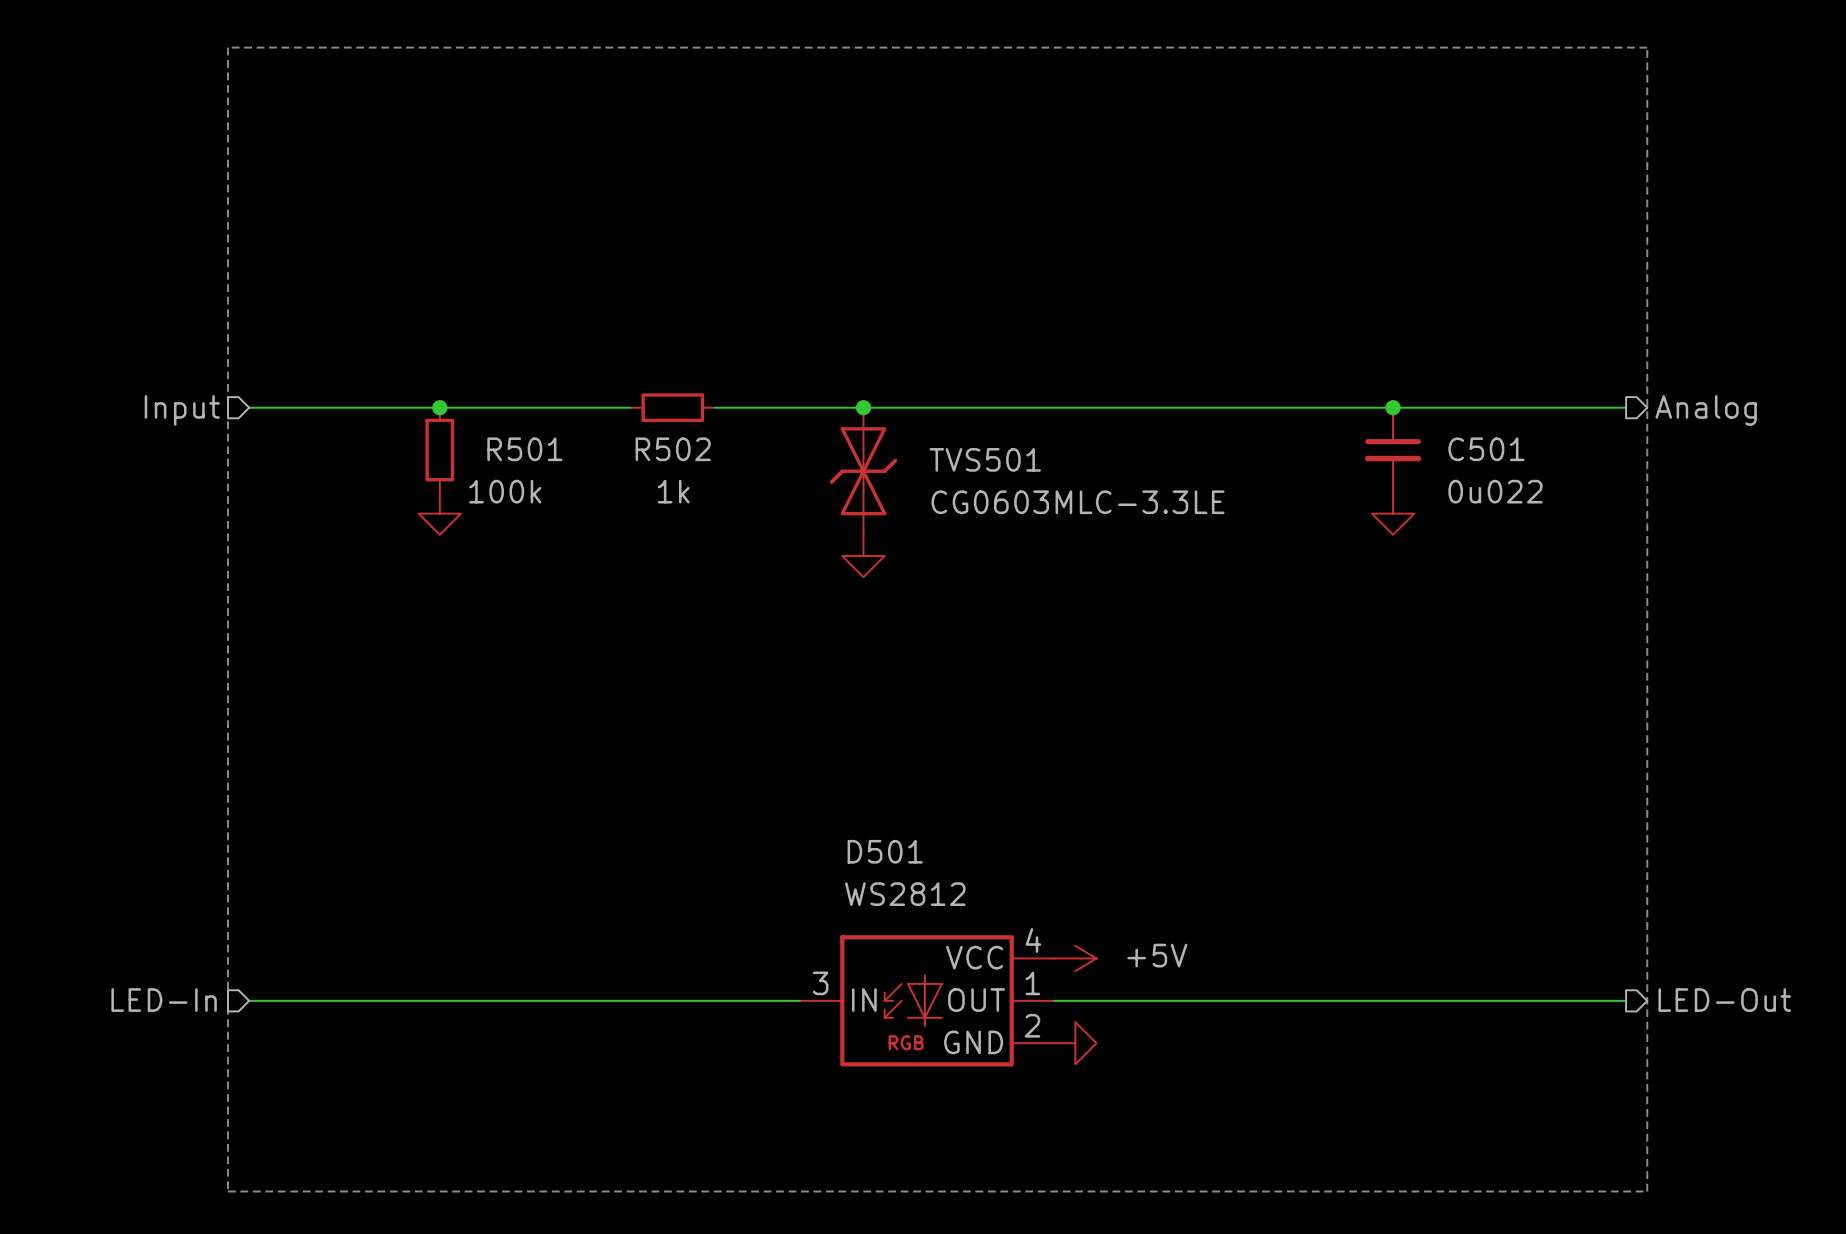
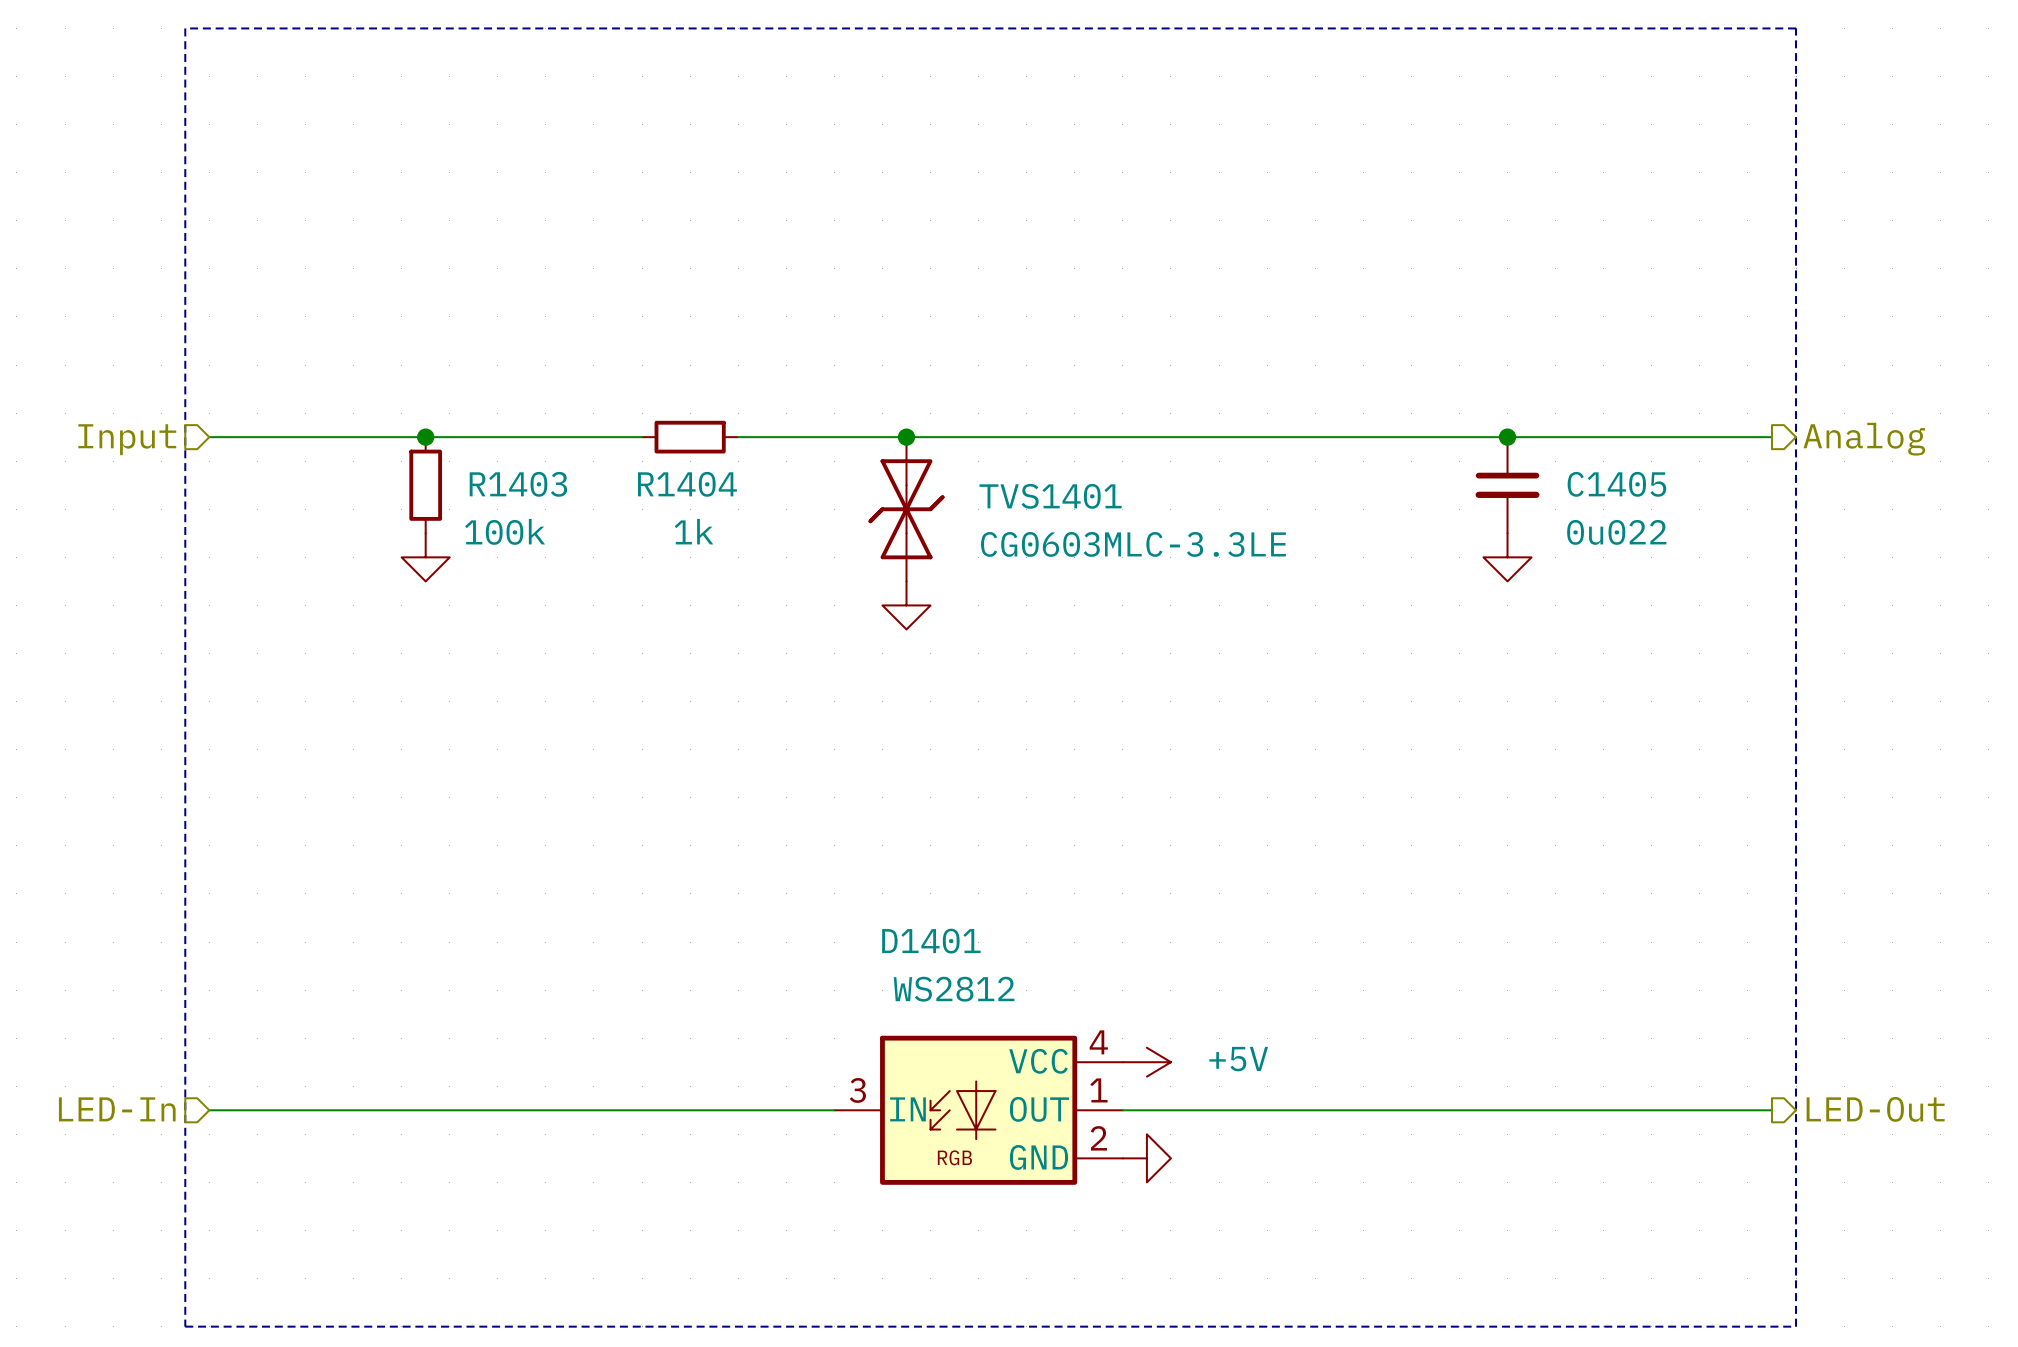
R501 name: R501 (524, 449) -> R1403 (518, 484)
R502 name: R502 (673, 449) -> R1404 (687, 484)
C501 name: C501 (1486, 449) -> C1405 (1616, 484)
TVS501 name: TVS501 (985, 459) -> TVS1401 (1050, 496)
D501 name: D501 (885, 851) -> D1401 (931, 941)

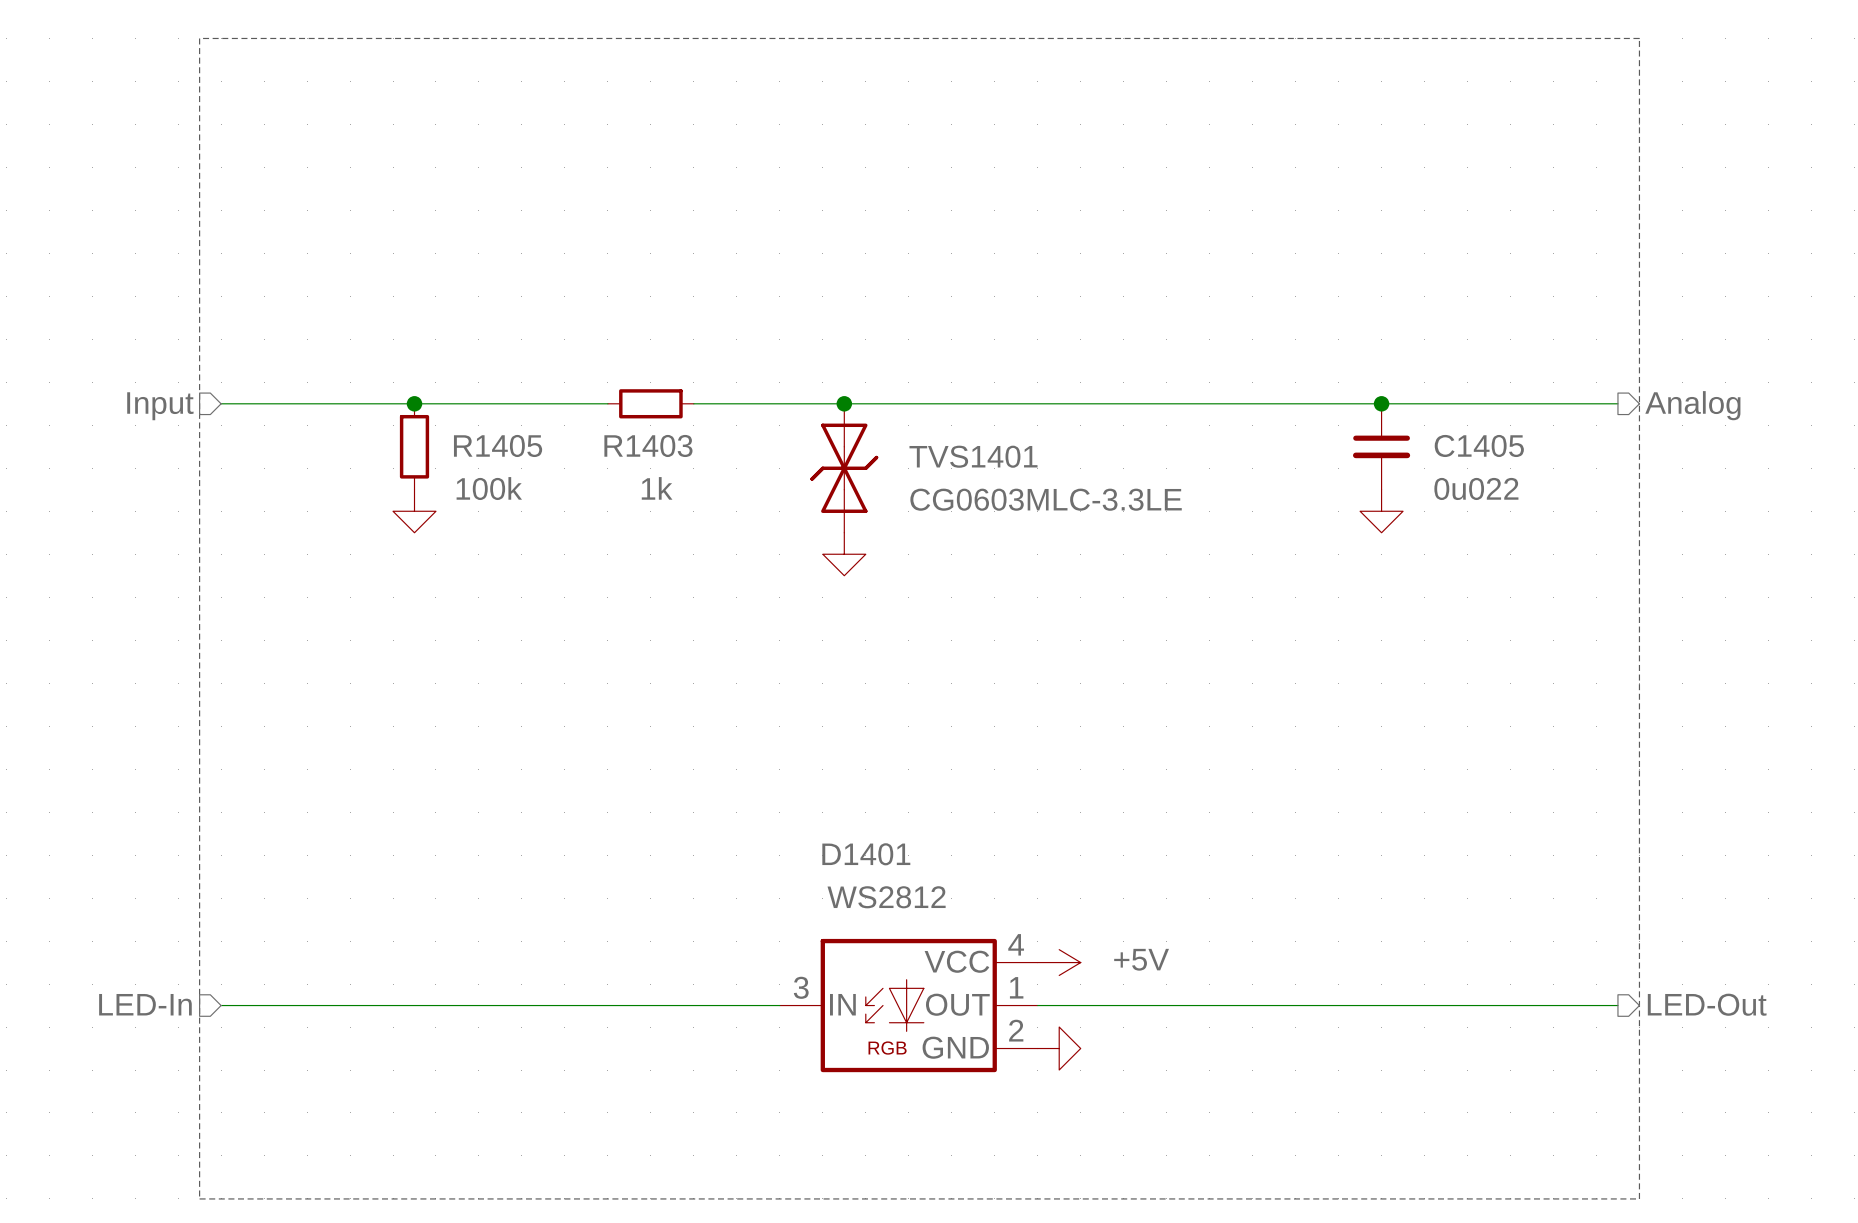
R1403 name: R1403 (518, 484) -> R1405 (498, 445)
R1404 name: R1404 (687, 484) -> R1403 (648, 445)

